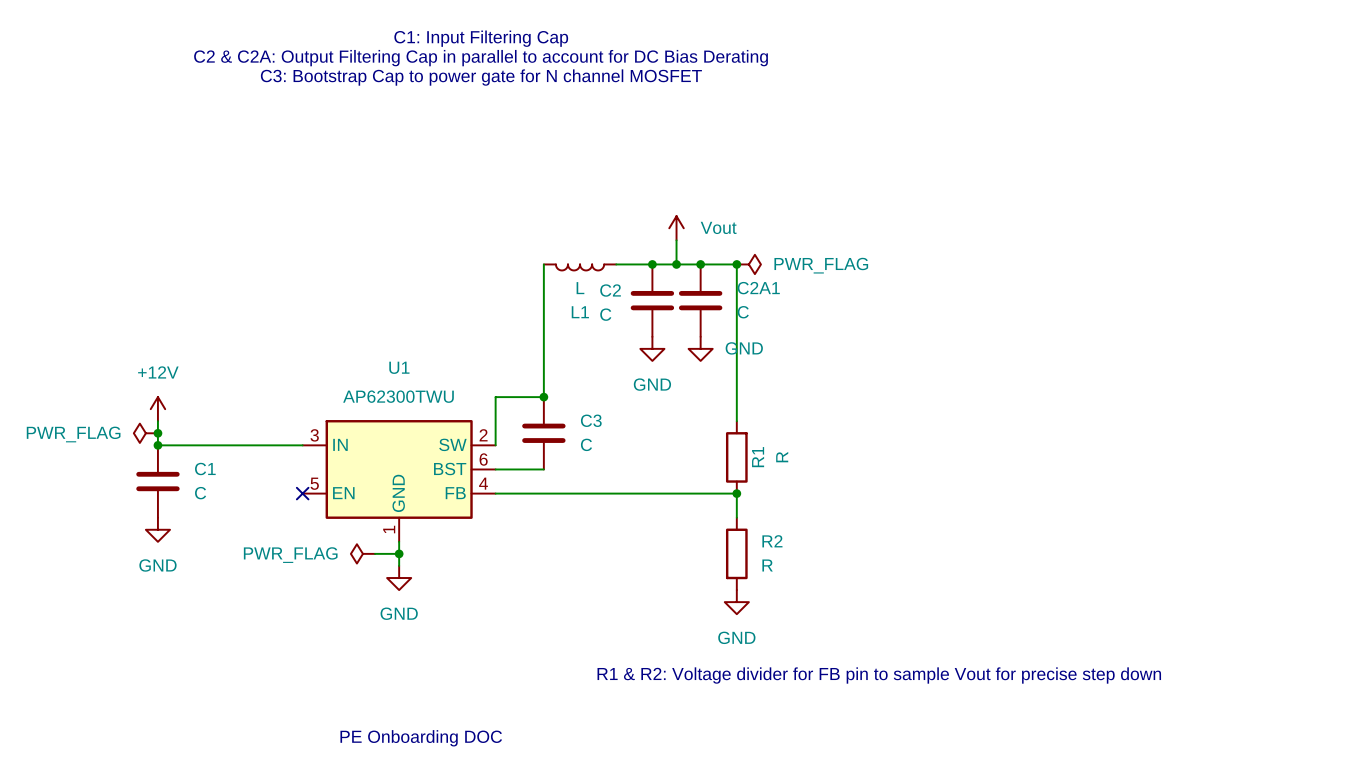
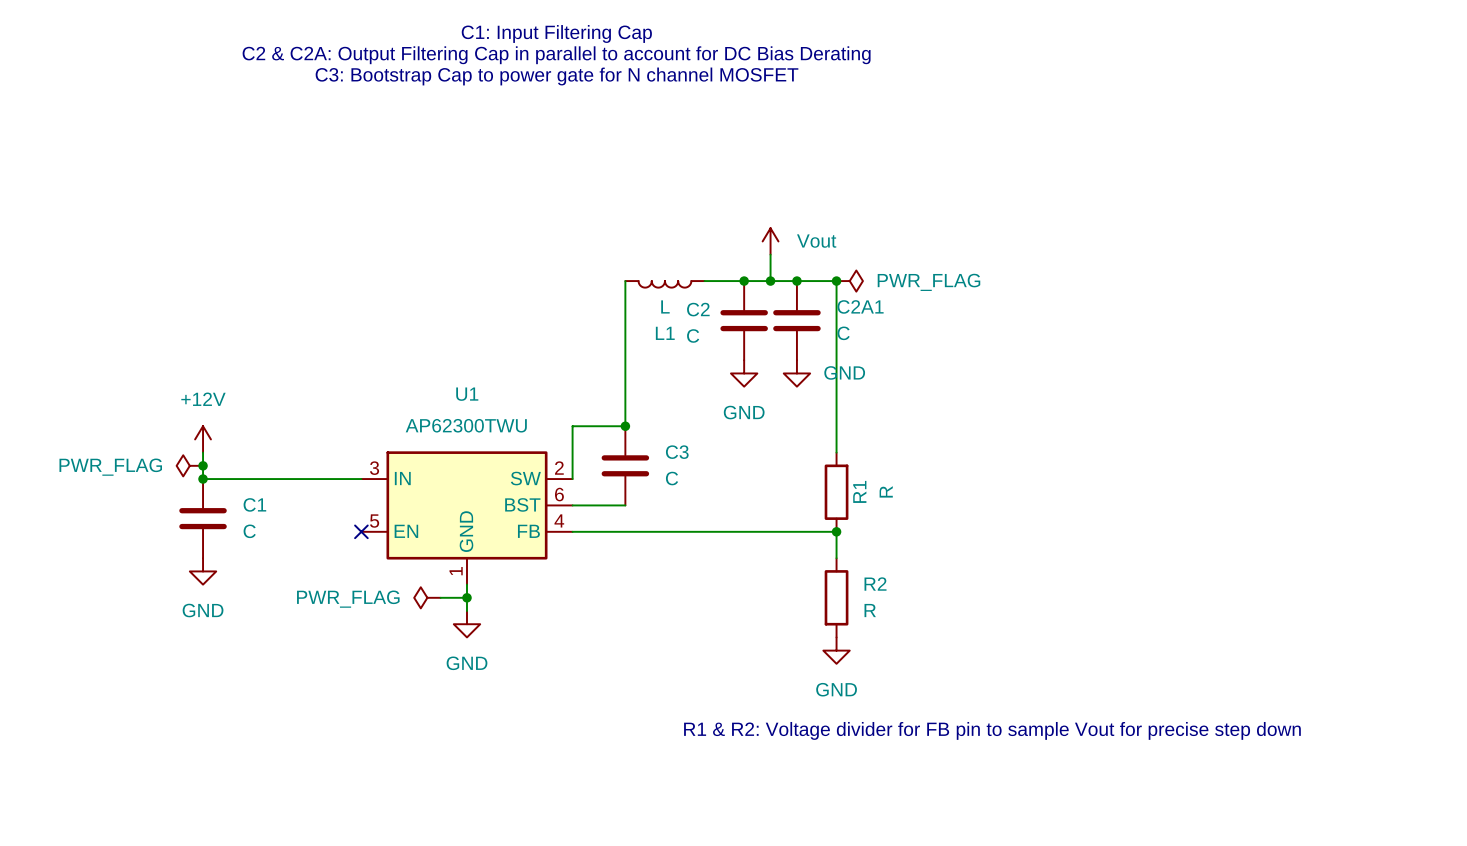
text: PE Onboarding DOC (421, 738) -> none

